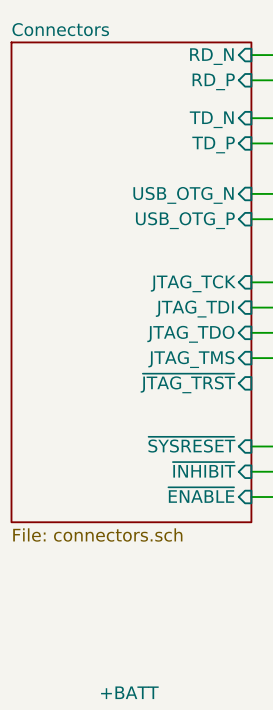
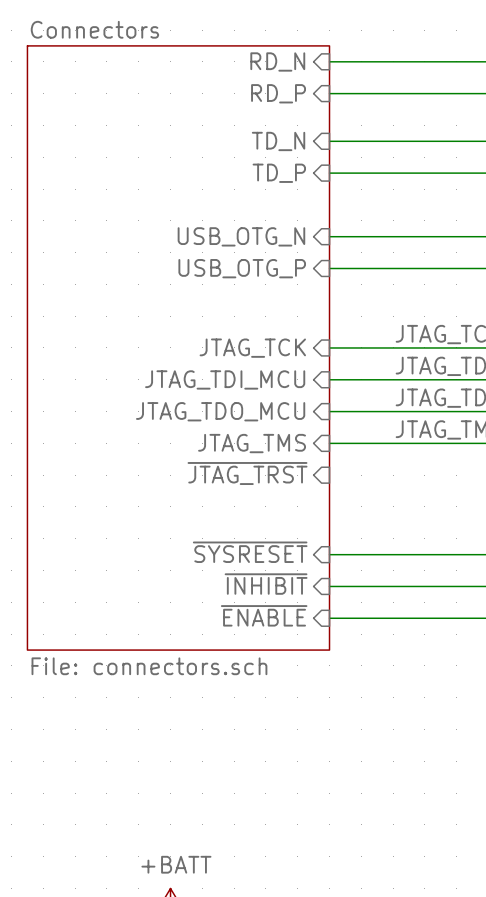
sheet pin: JTAG_TDI (194, 309) -> JTAG_TDI_MCU (225, 379)
sheet pin: JTAG_TDO (190, 334) -> JTAG_TDO_MCU (220, 411)

